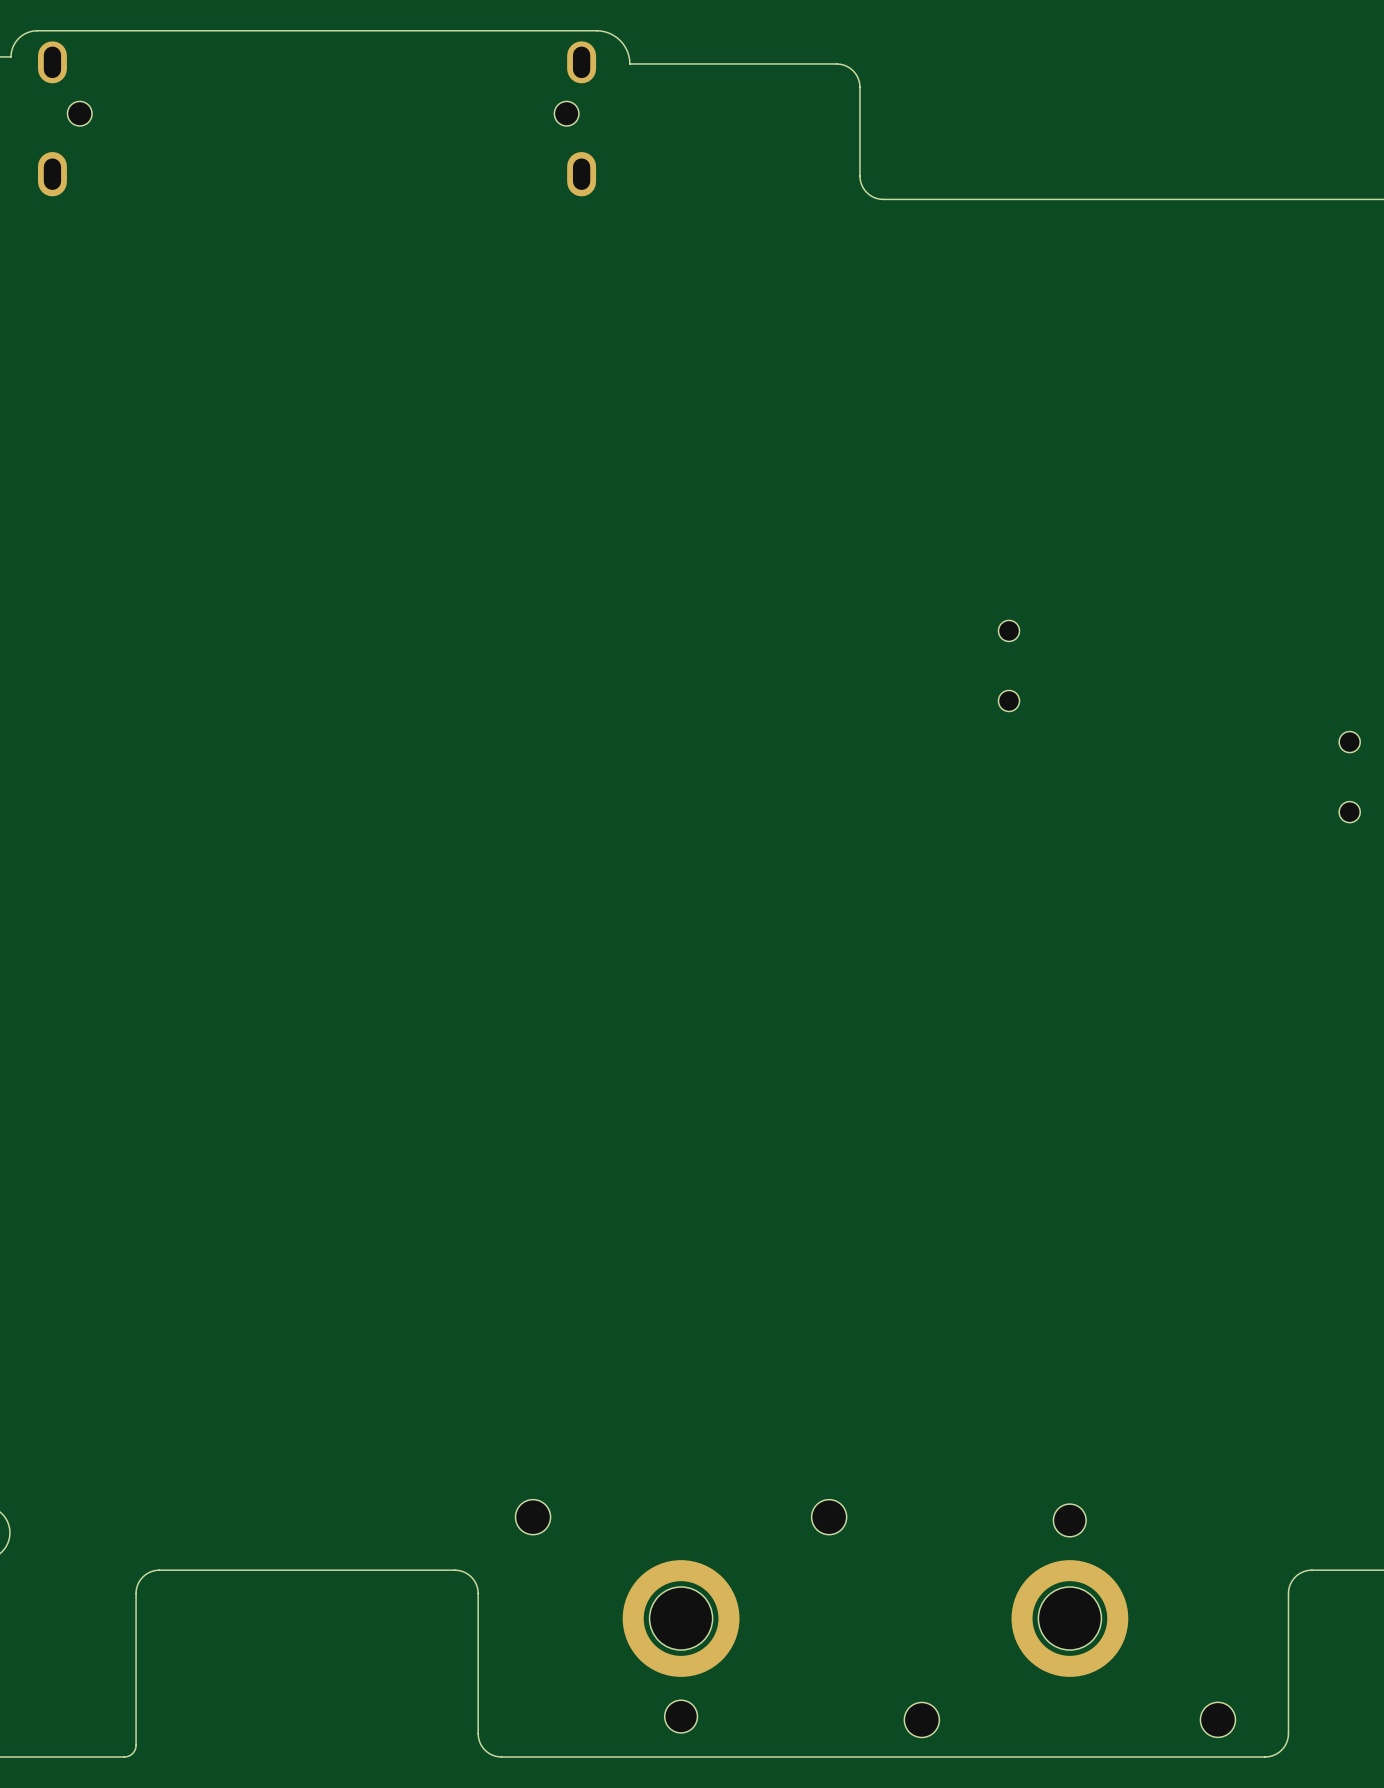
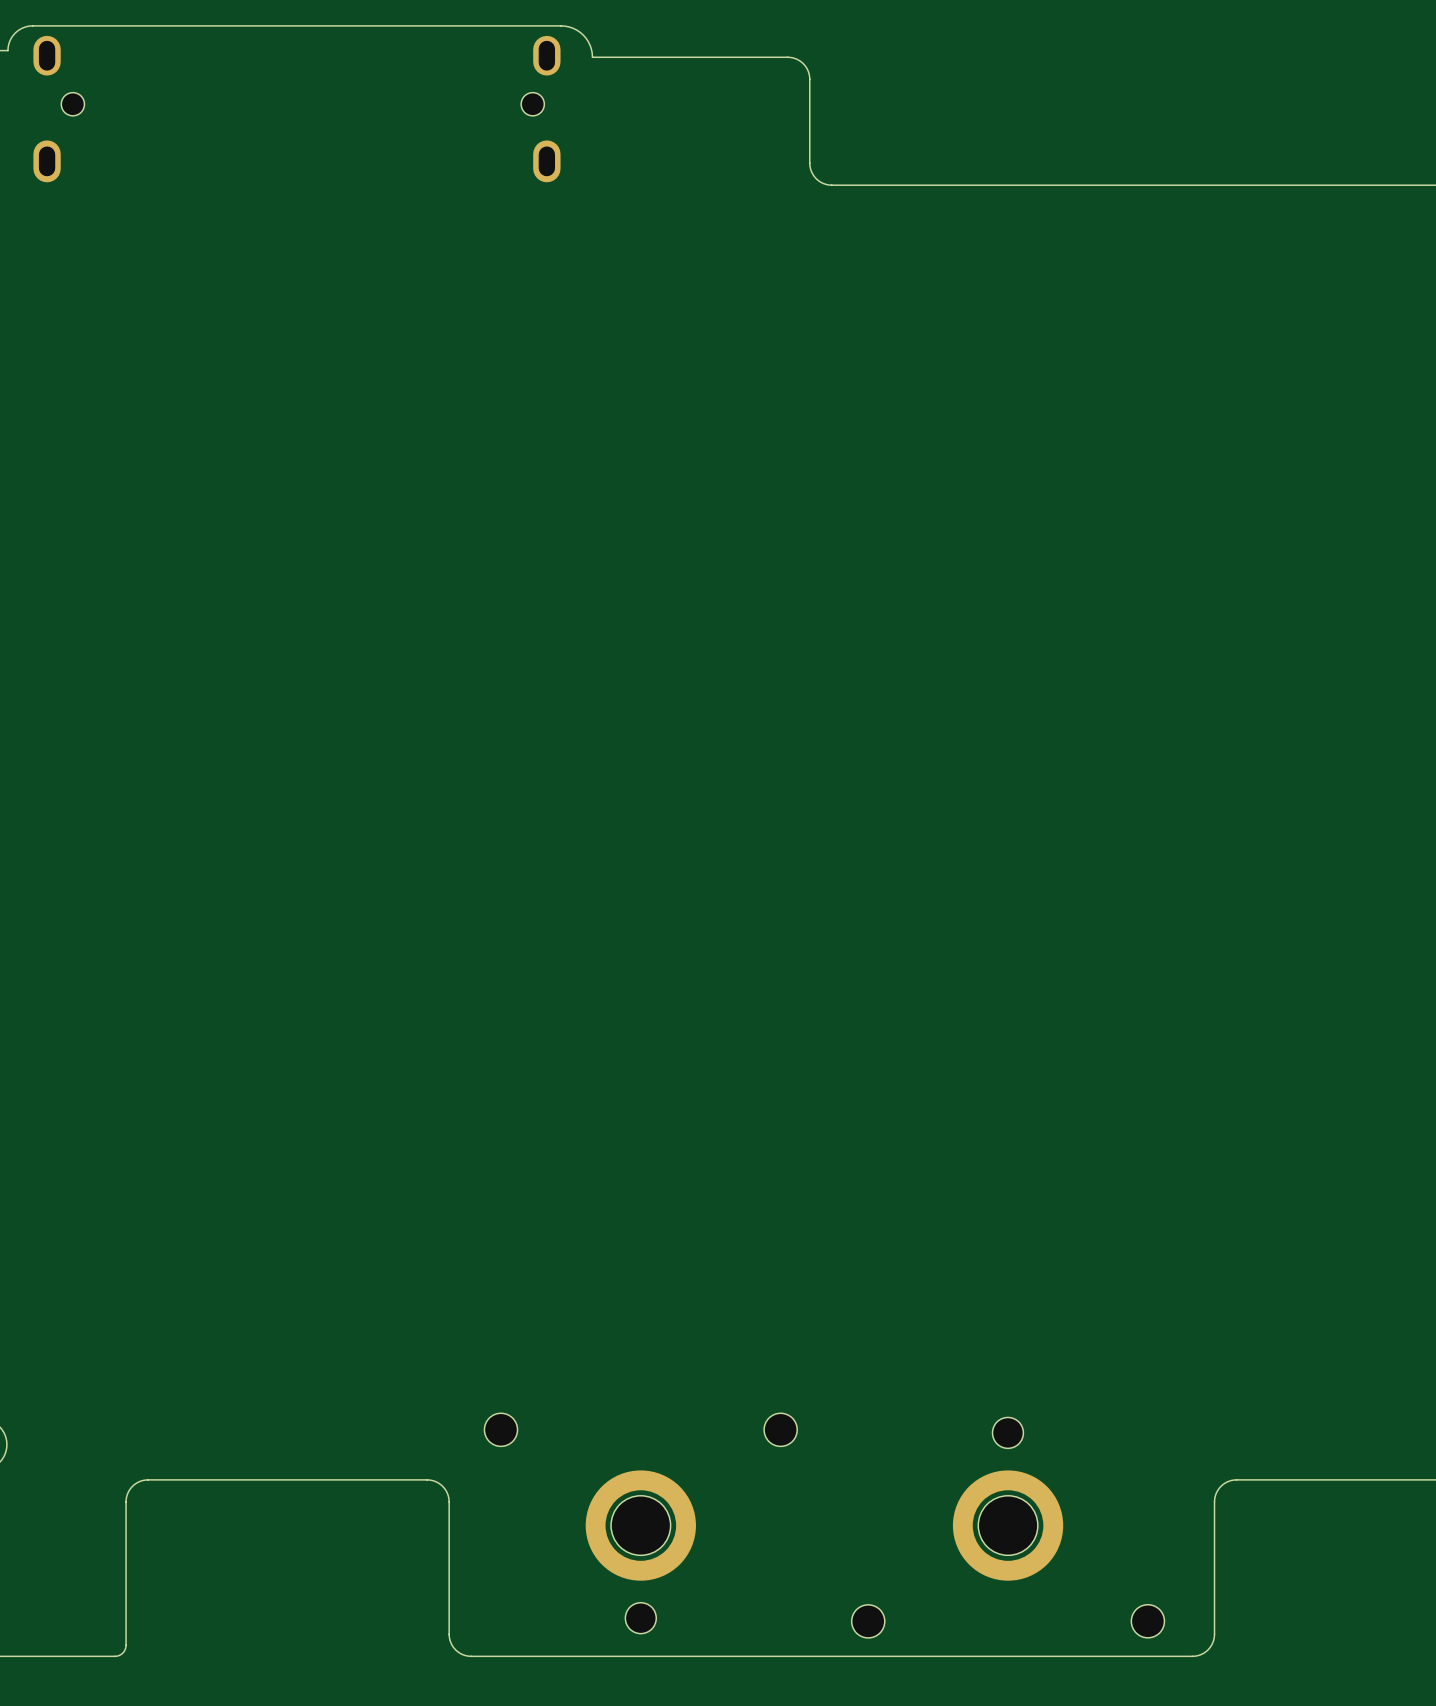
part: (1009, 665) -> none
part: (1349, 777) -> none

